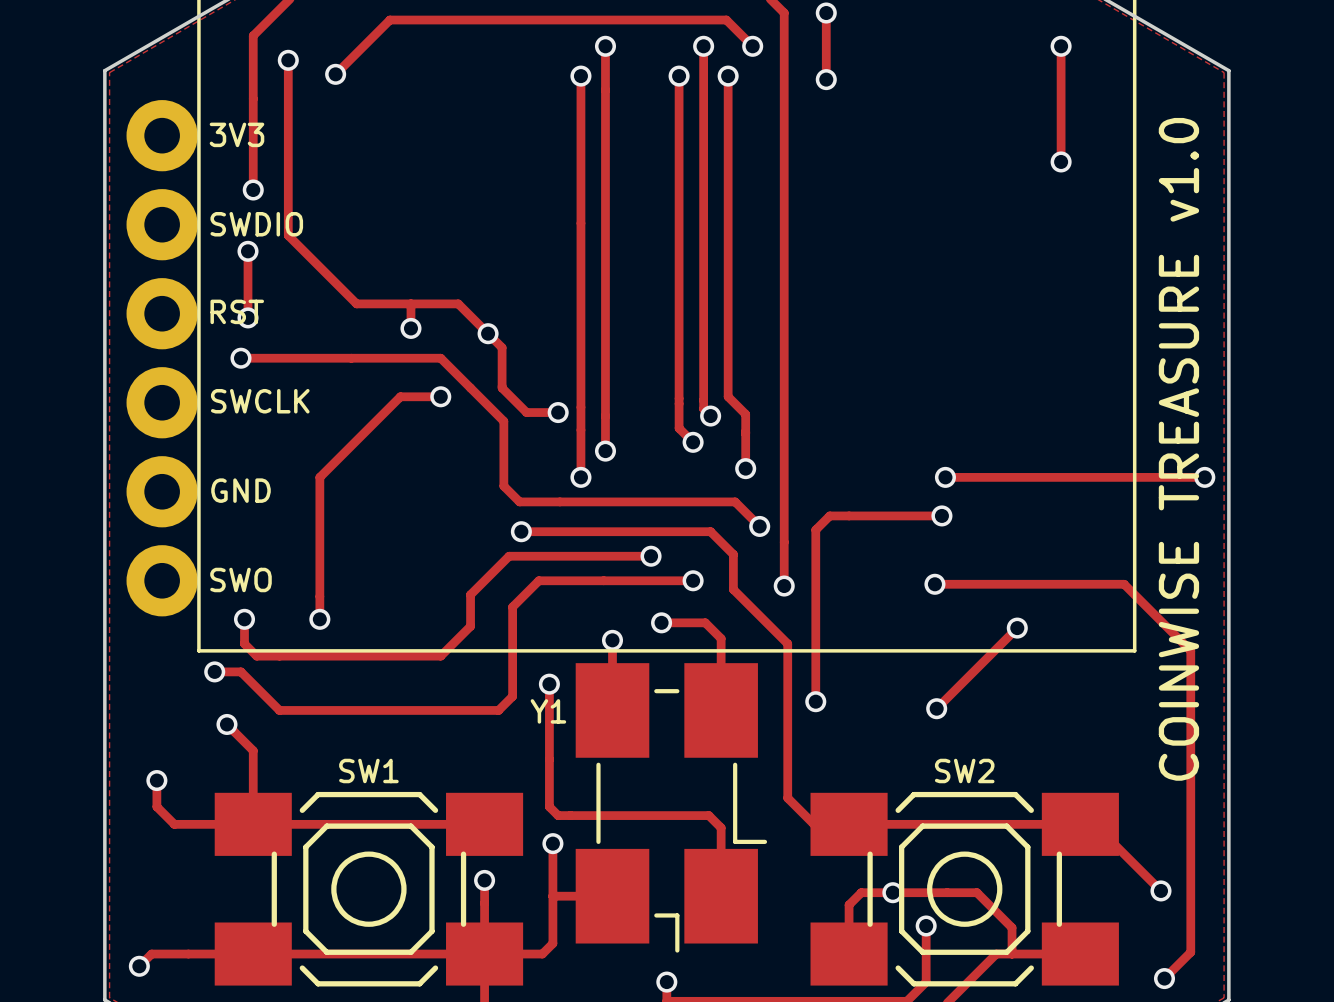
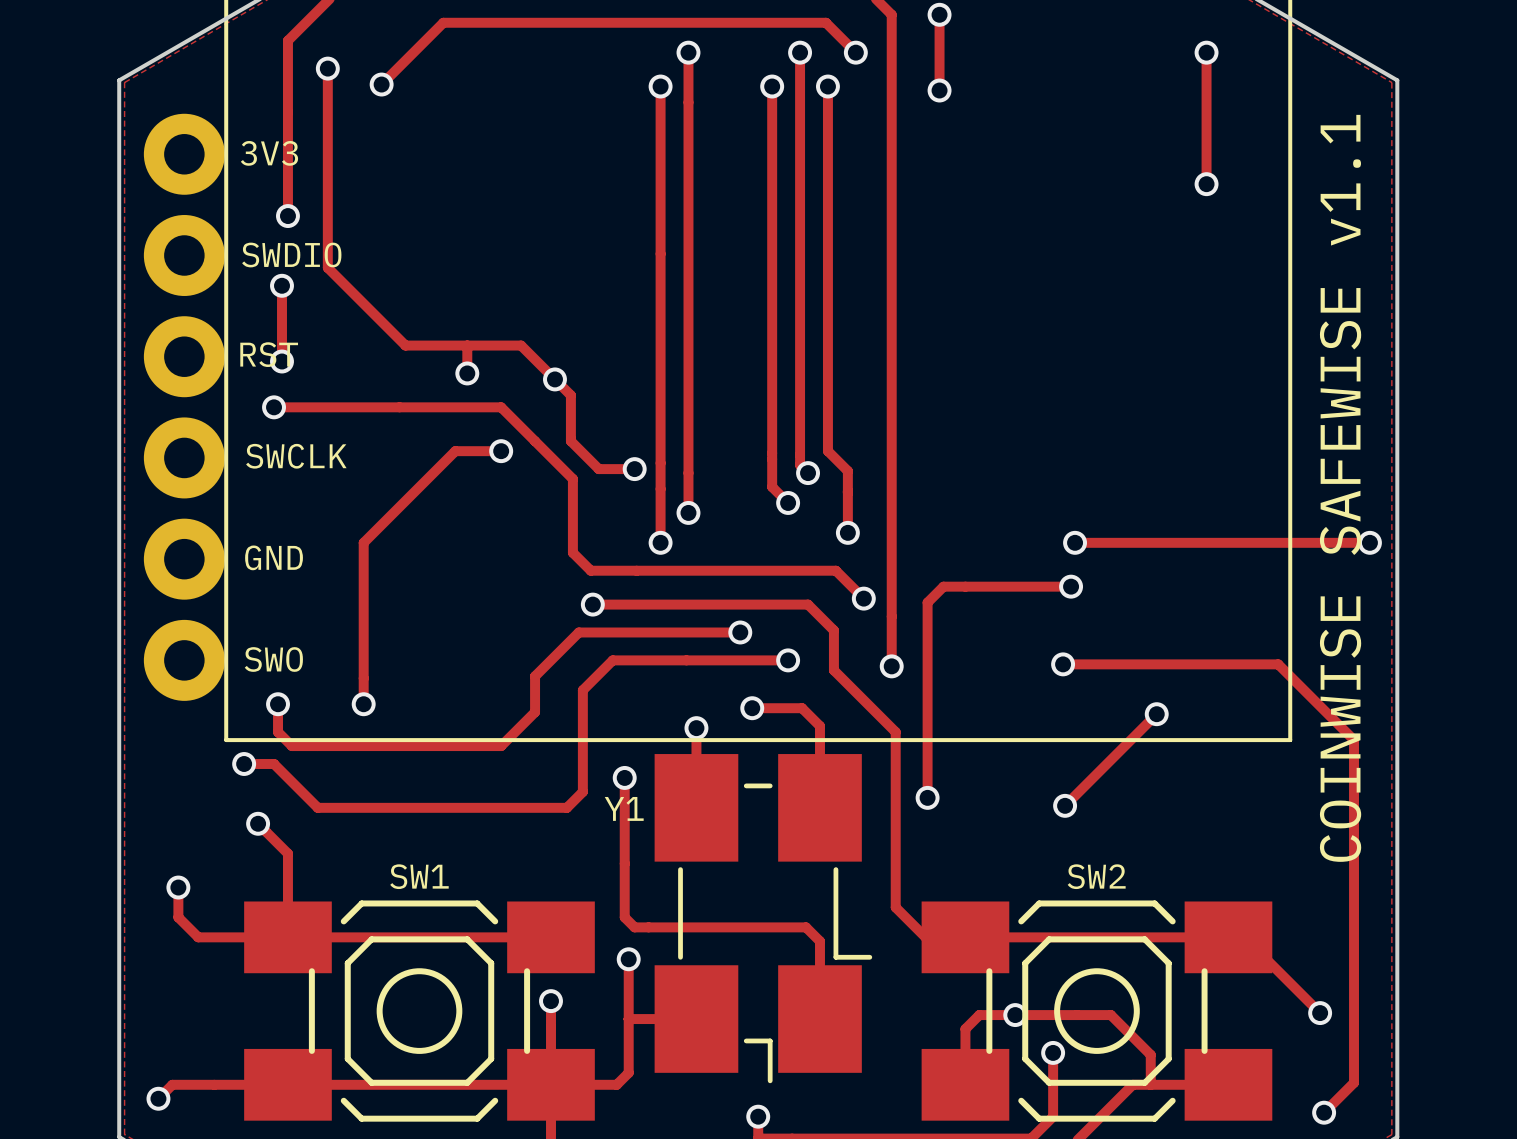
text: COINWISE TREASURE v1.0 (1178, 449) -> COINWISE SAFEWISE v1.1 (1340, 488)

